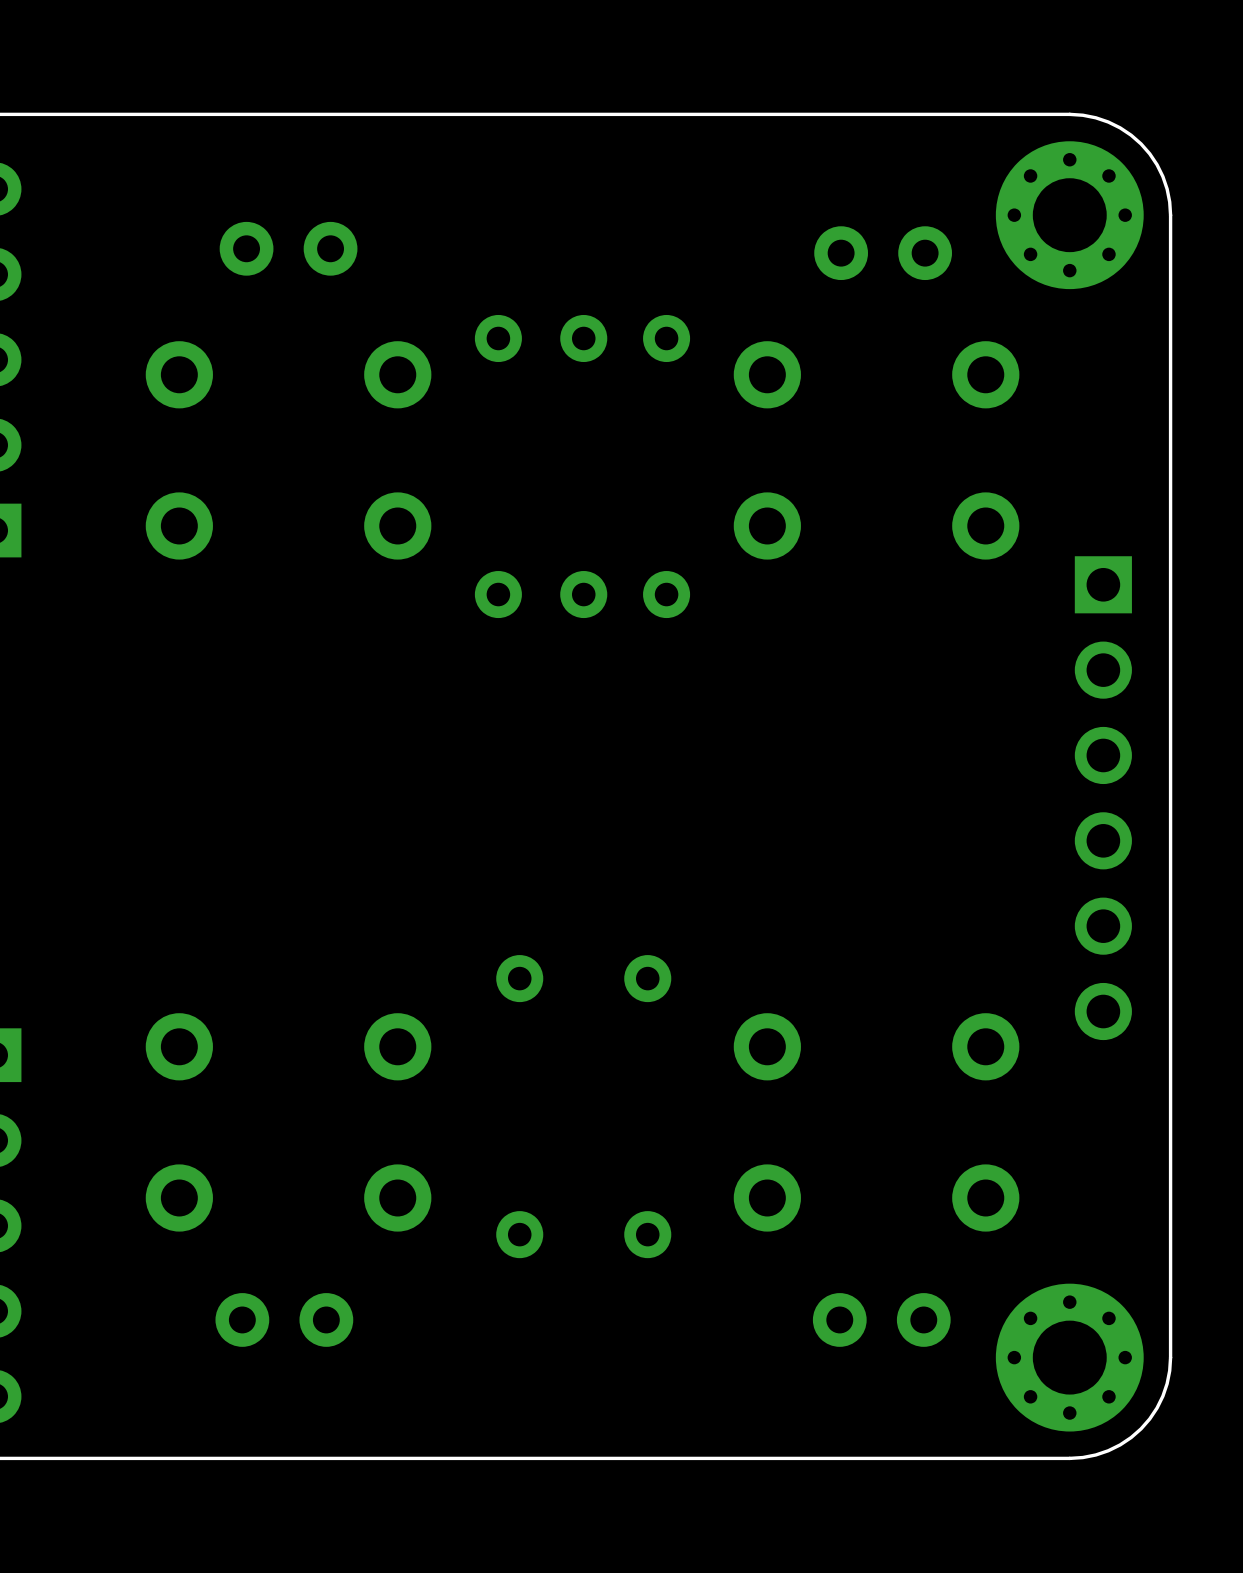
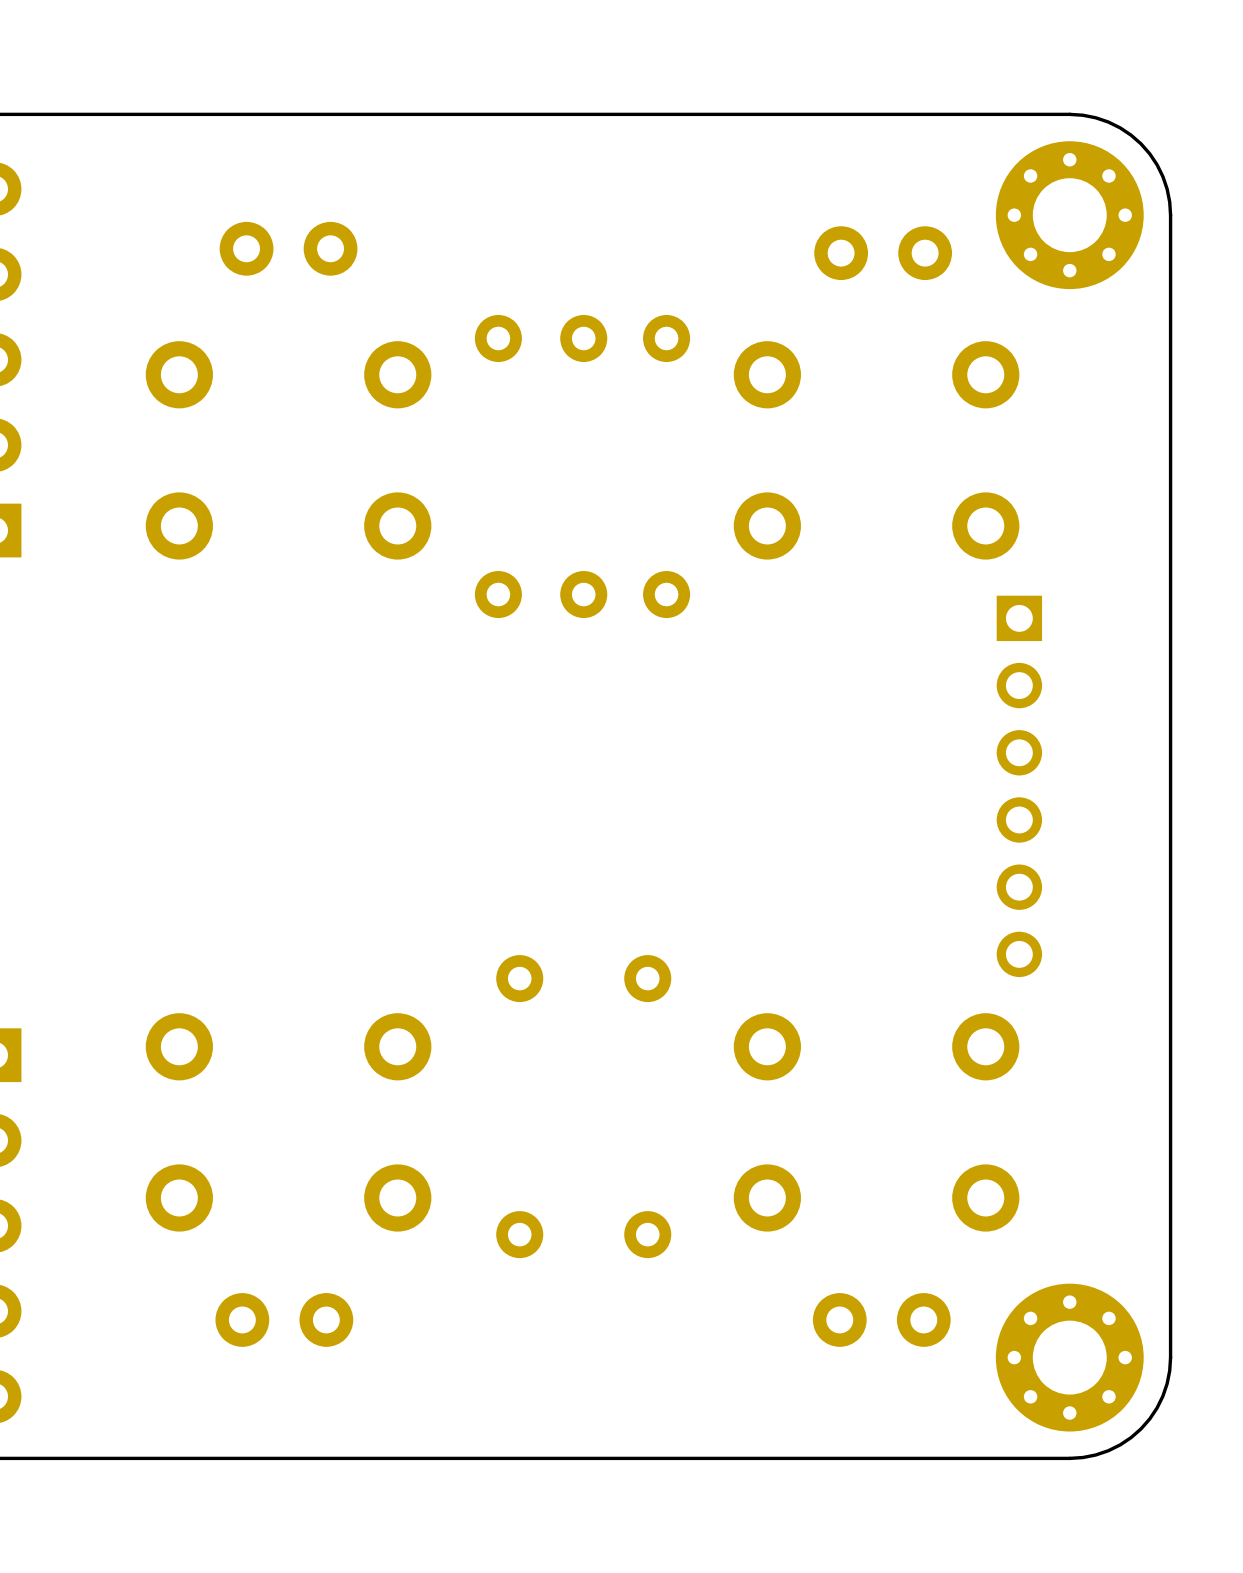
part: none -> (1019, 786)
part: (1103, 798) -> none

